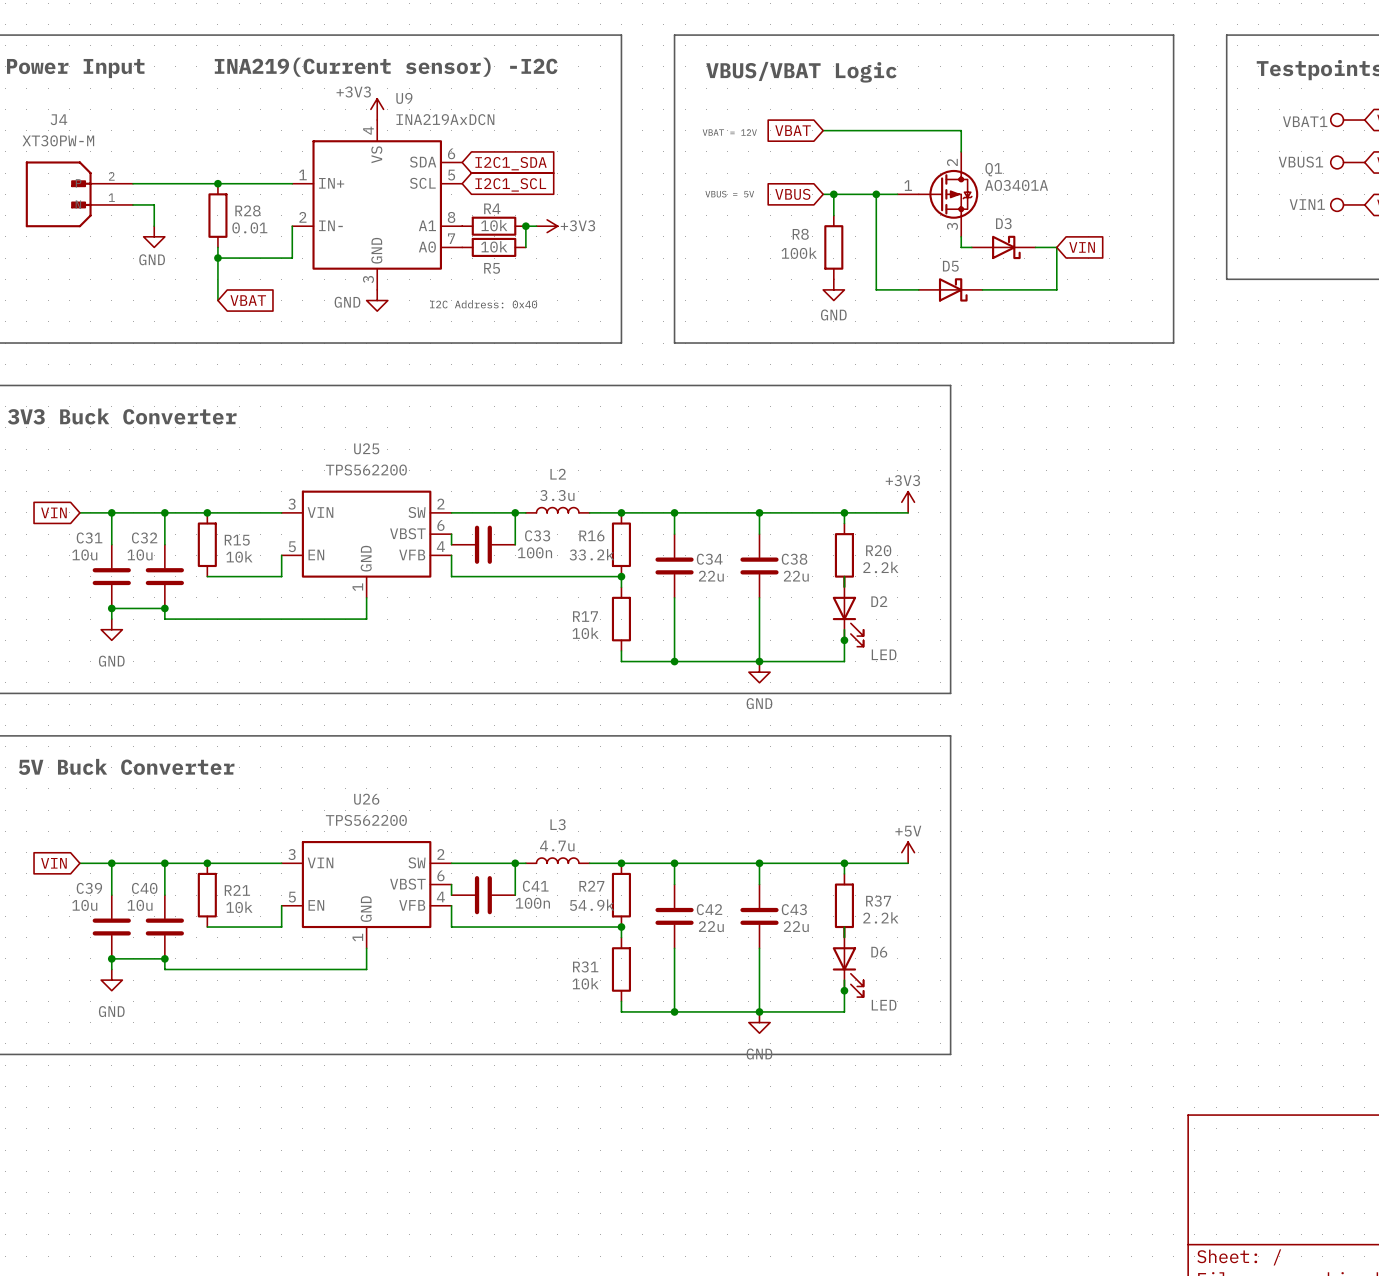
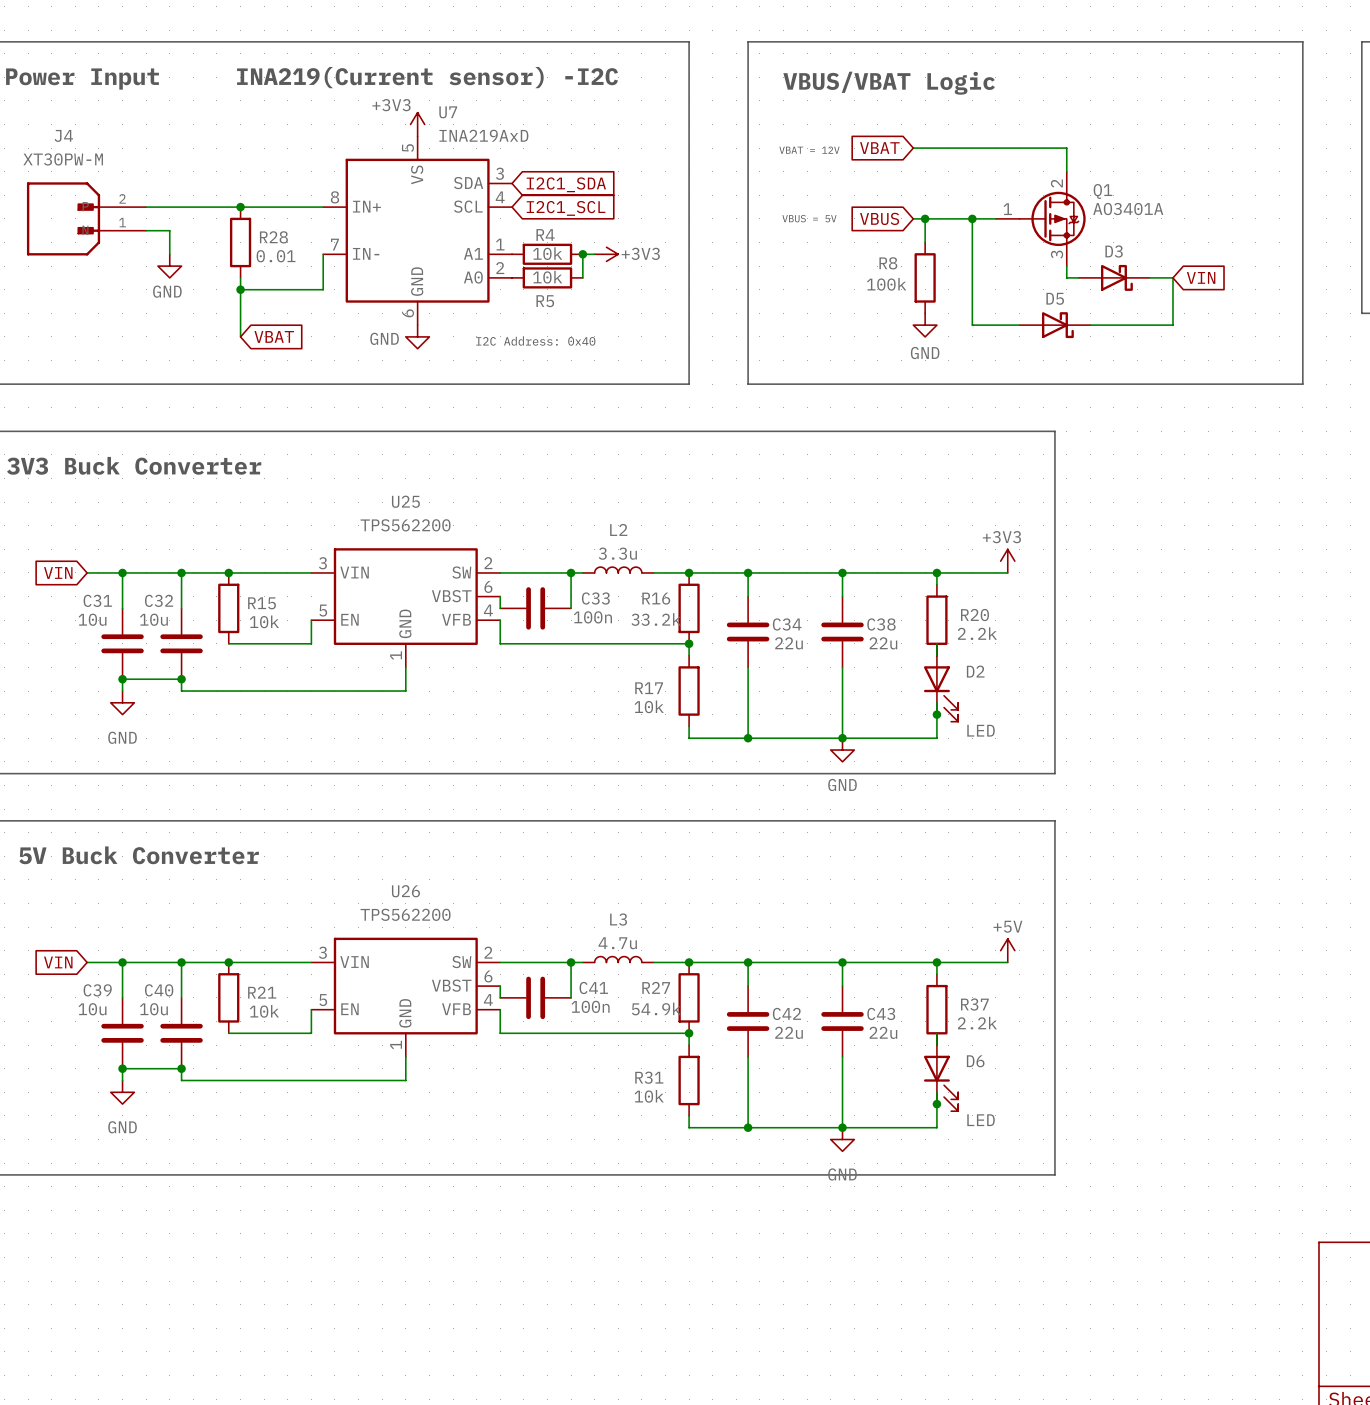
U9 name: U9 (404, 98) -> U7 (448, 112)
U9 value: INA219AxDCN (445, 119) -> INA219AxD (483, 135)
U9 pin number: 4 (368, 130) -> 5 (407, 148)
U9 pin number: 6 (451, 153) -> 3 (499, 173)
U9 pin number: 1 (302, 174) -> 8 (334, 197)
U9 pin number: 5 (451, 175) -> 4 (500, 197)
U9 pin number: 2 (302, 217) -> 7 (334, 244)
U9 pin number: 8 (451, 217) -> 1 (500, 244)
U9 pin number: 7 (451, 238) -> 2 (500, 268)
U9 pin number: 3 (368, 279) -> 6 (407, 313)

